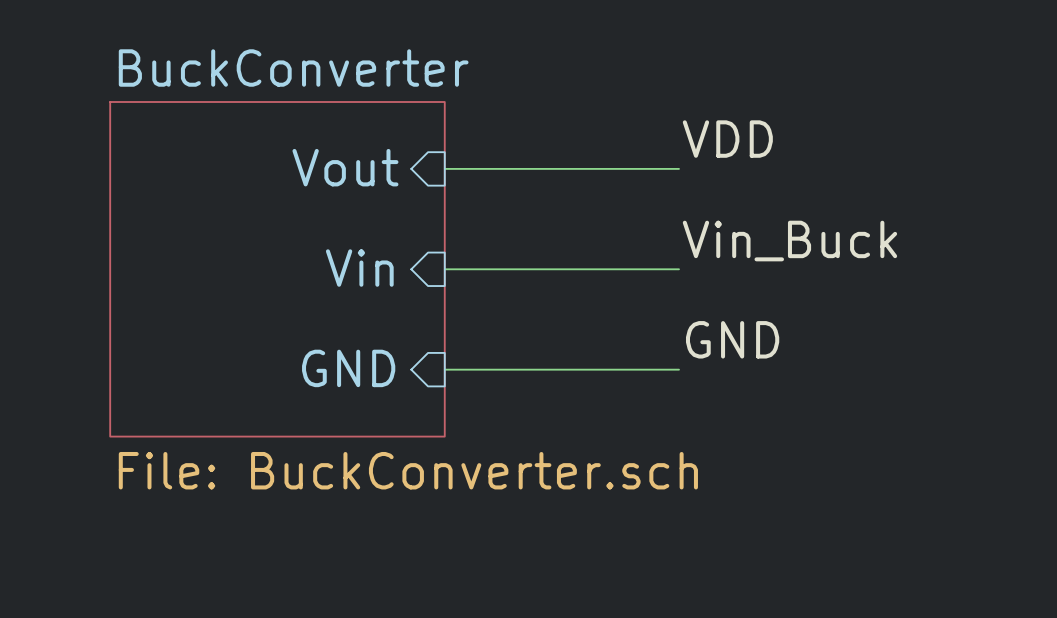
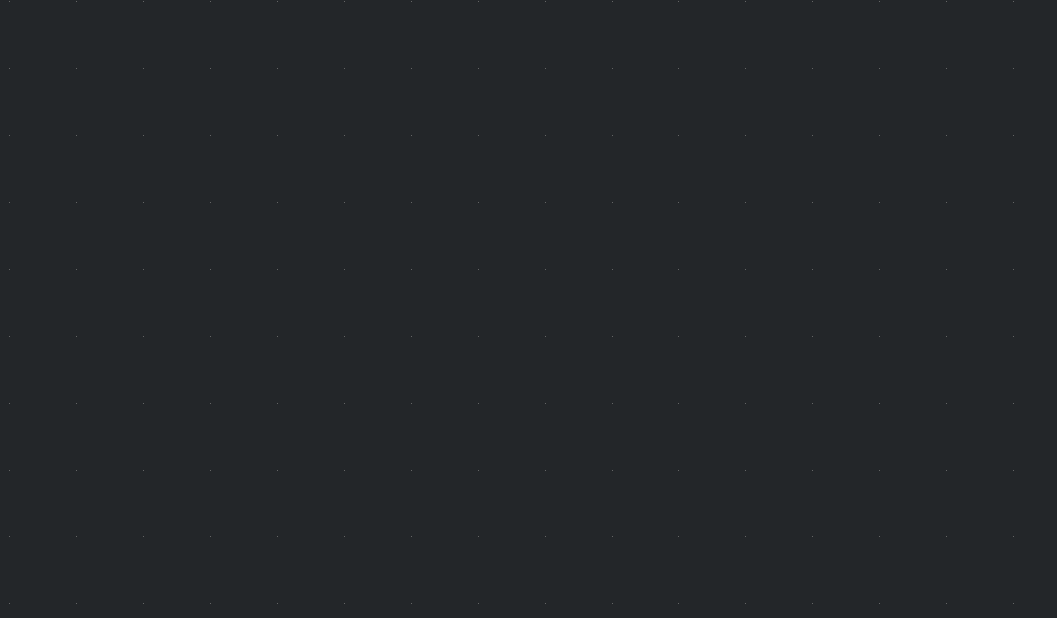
label: VDD (727, 139) -> none
sheet pin: Vout (345, 167) -> none
wire: (444, 168) (678, 168) -> none
label: Vin_Buck (789, 241) -> none
sheet pin: Vin (359, 268) -> none
sheet BuckConverter: File: BuckConverter.sch (277, 269) -> none
wire: (444, 269) (678, 269) -> none
label: GND (732, 339) -> none
sheet pin: GND (348, 368) -> none
wire: (444, 369) (678, 369) -> none

